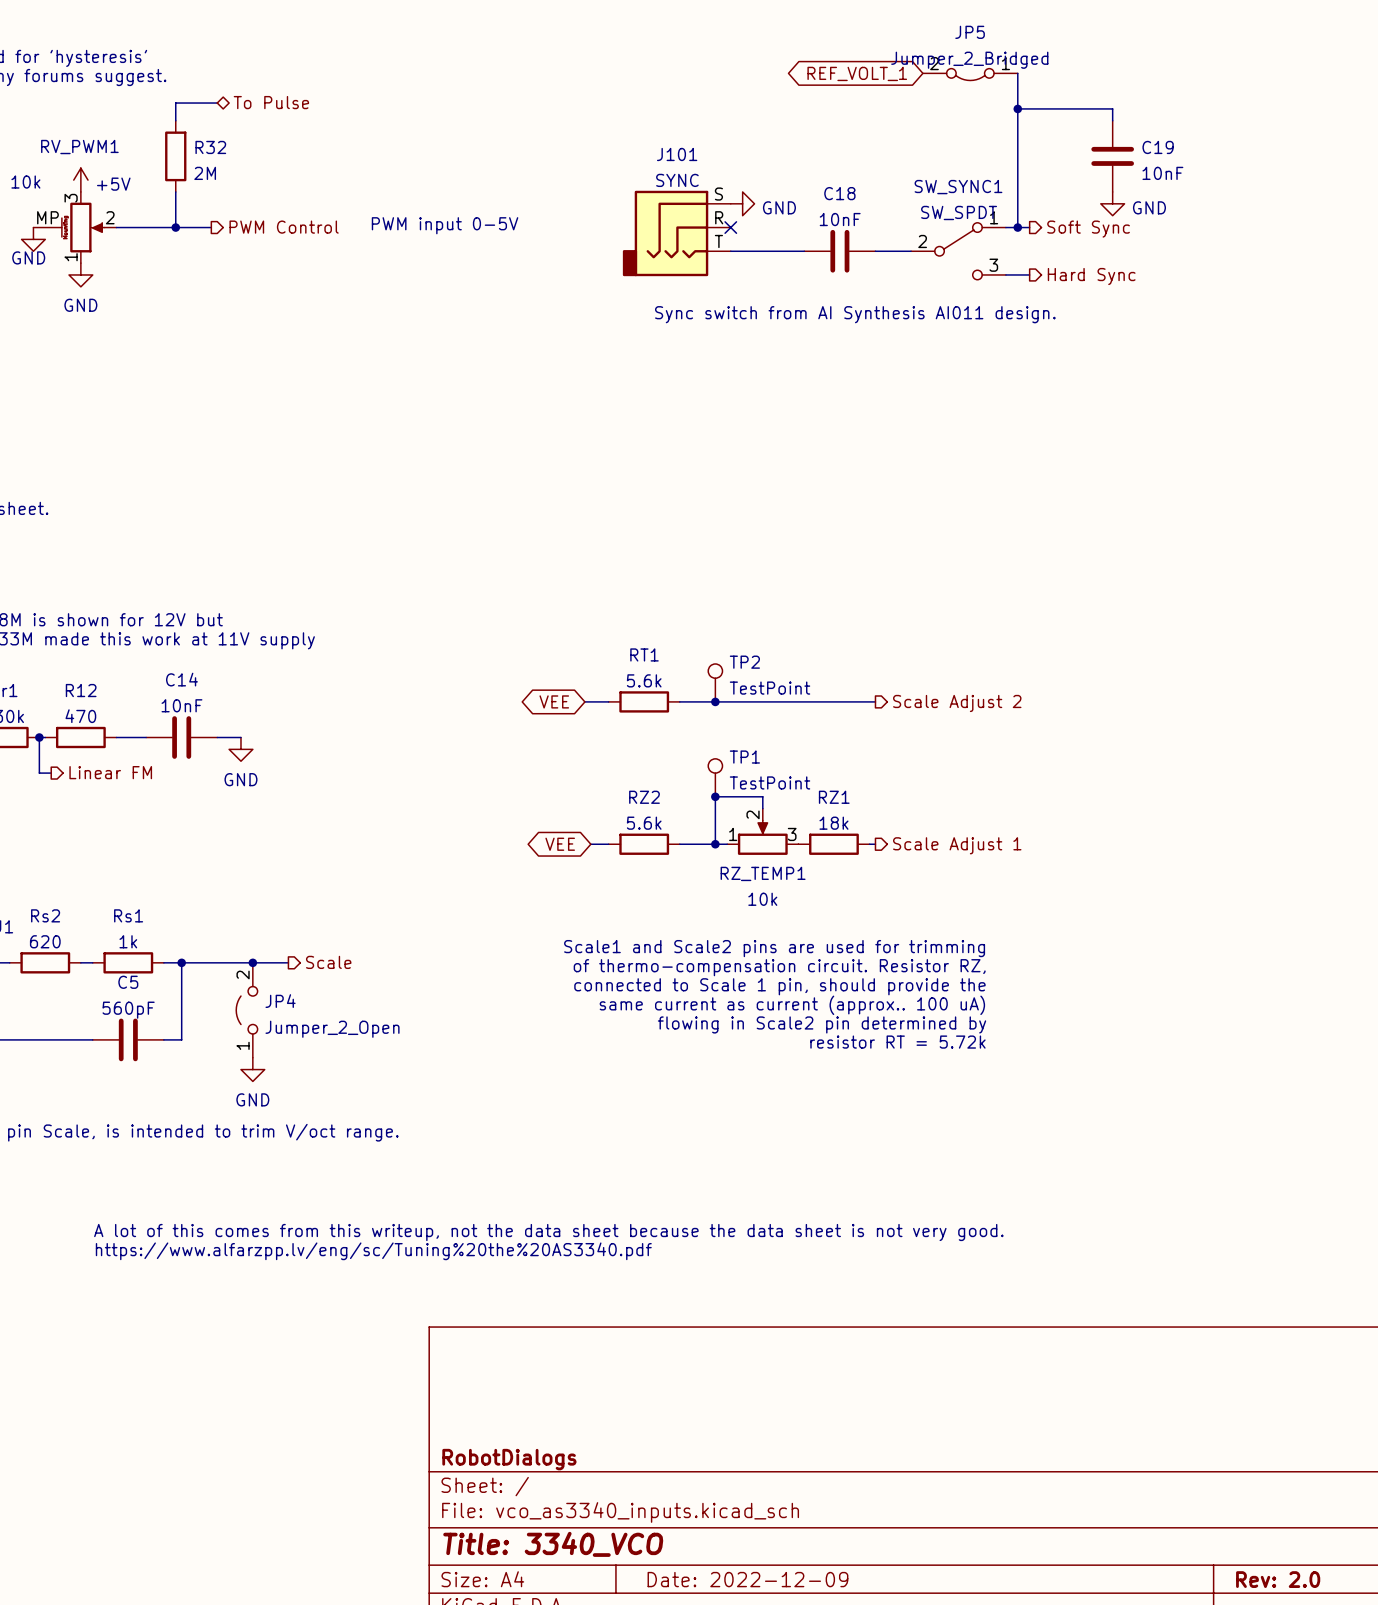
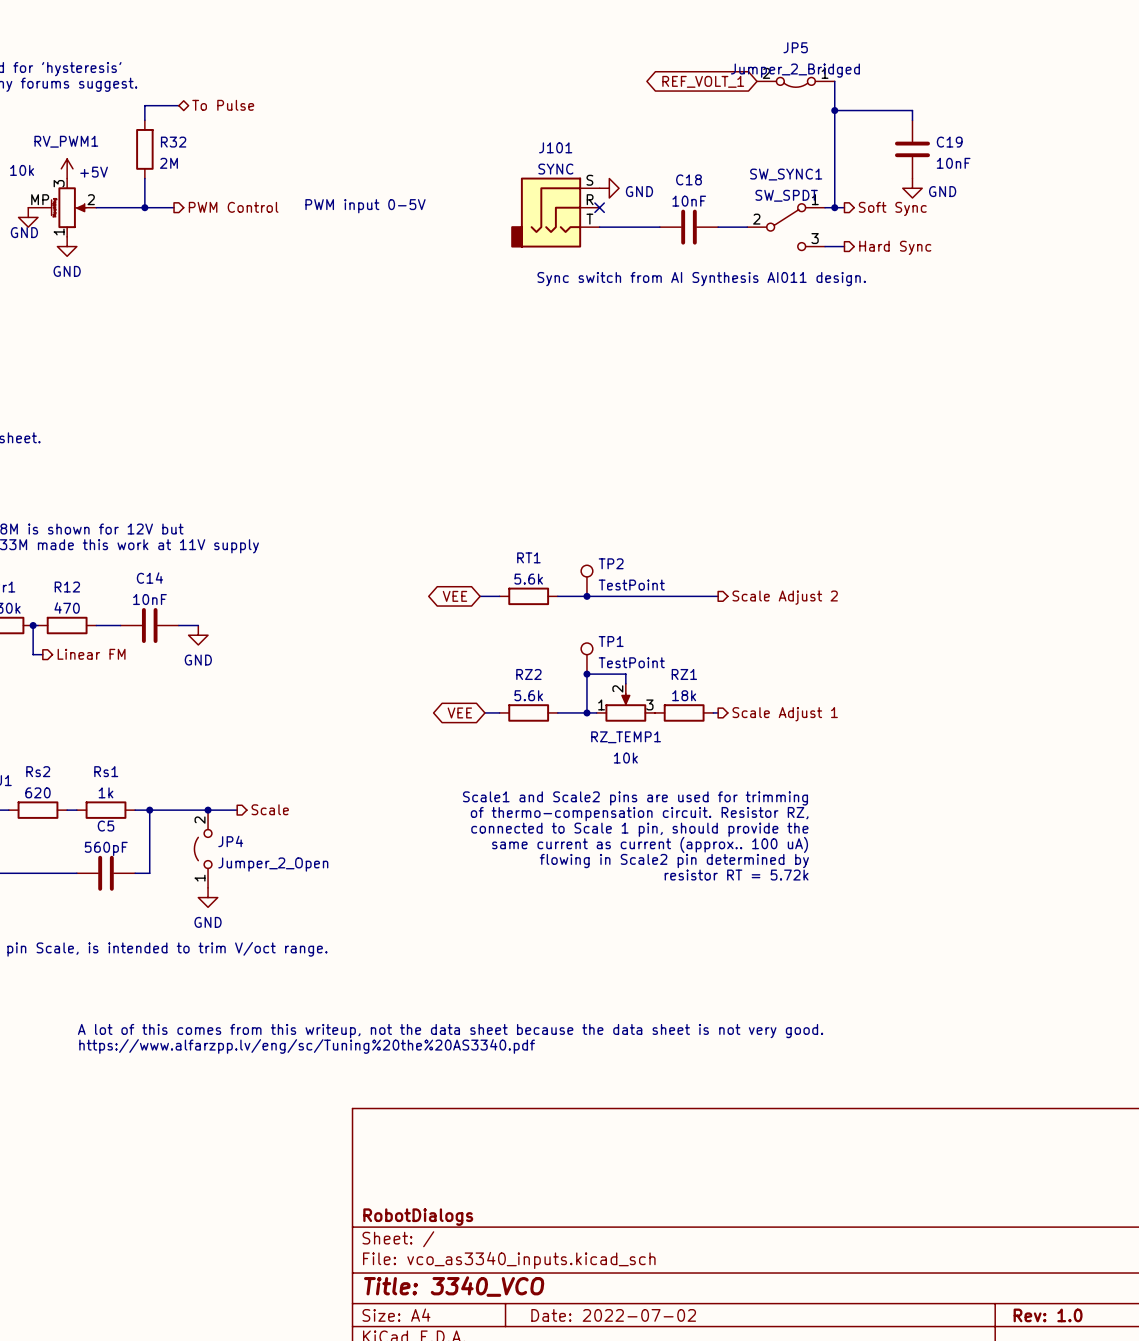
title block: Date: 2022-12-09 (747, 1579) -> Date: 2022-07-02 (613, 1315)
title block: Rev: 2.0 (1278, 1579) -> Rev: 1.0 (1048, 1315)

